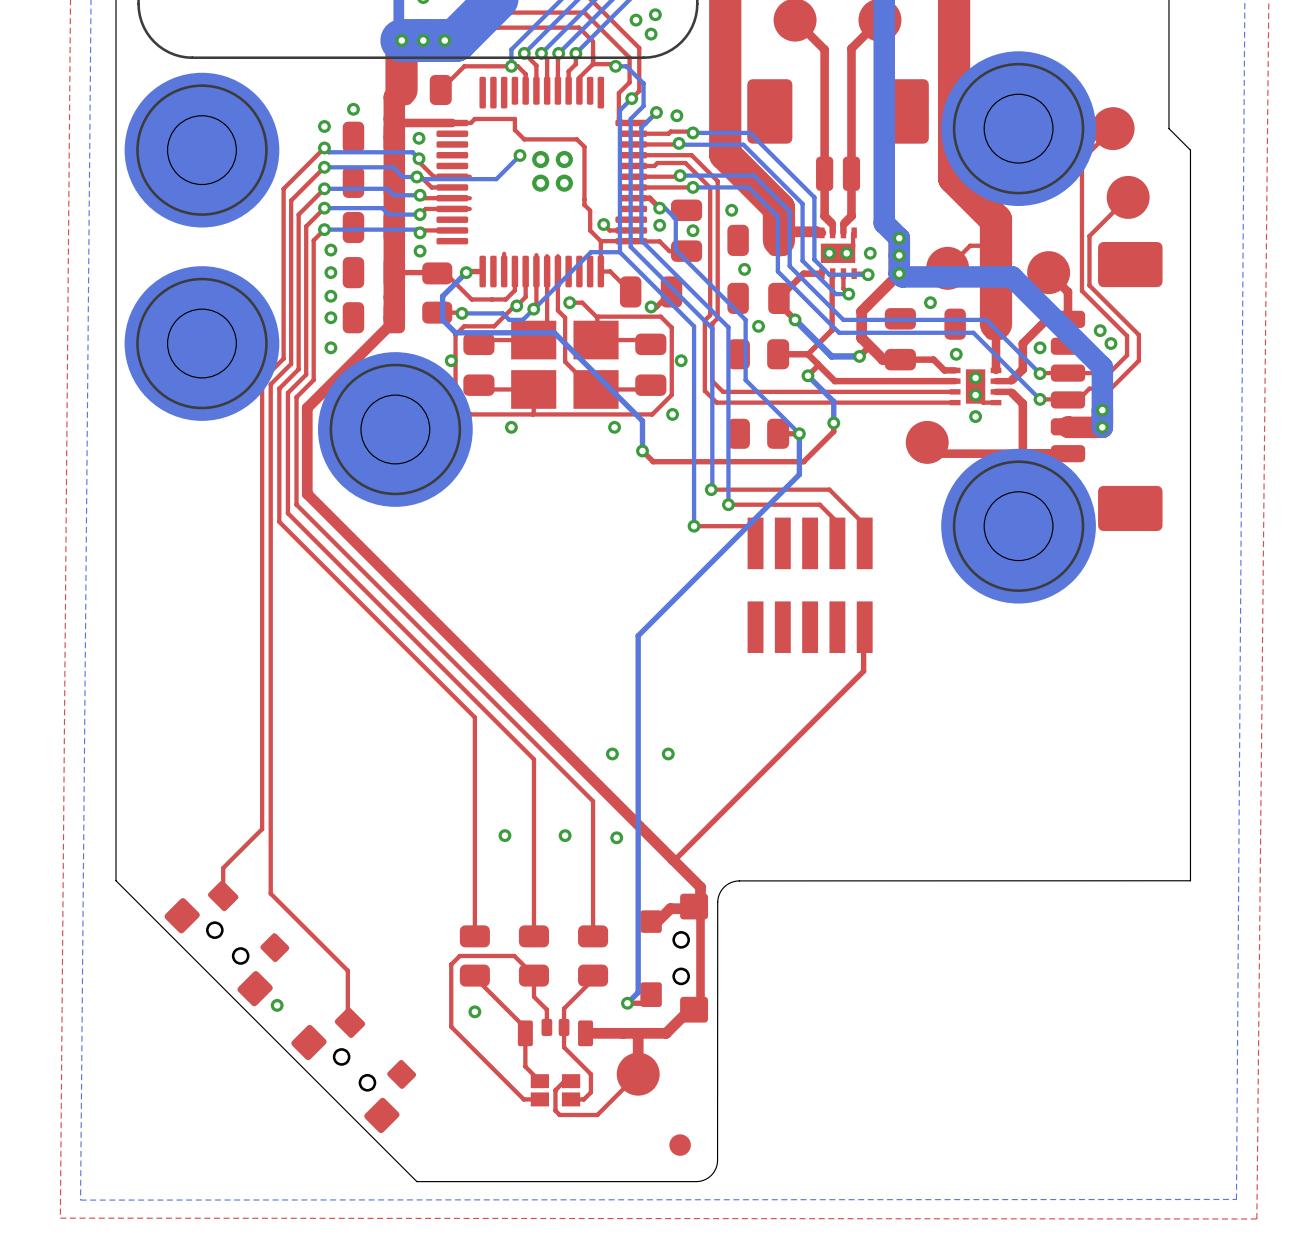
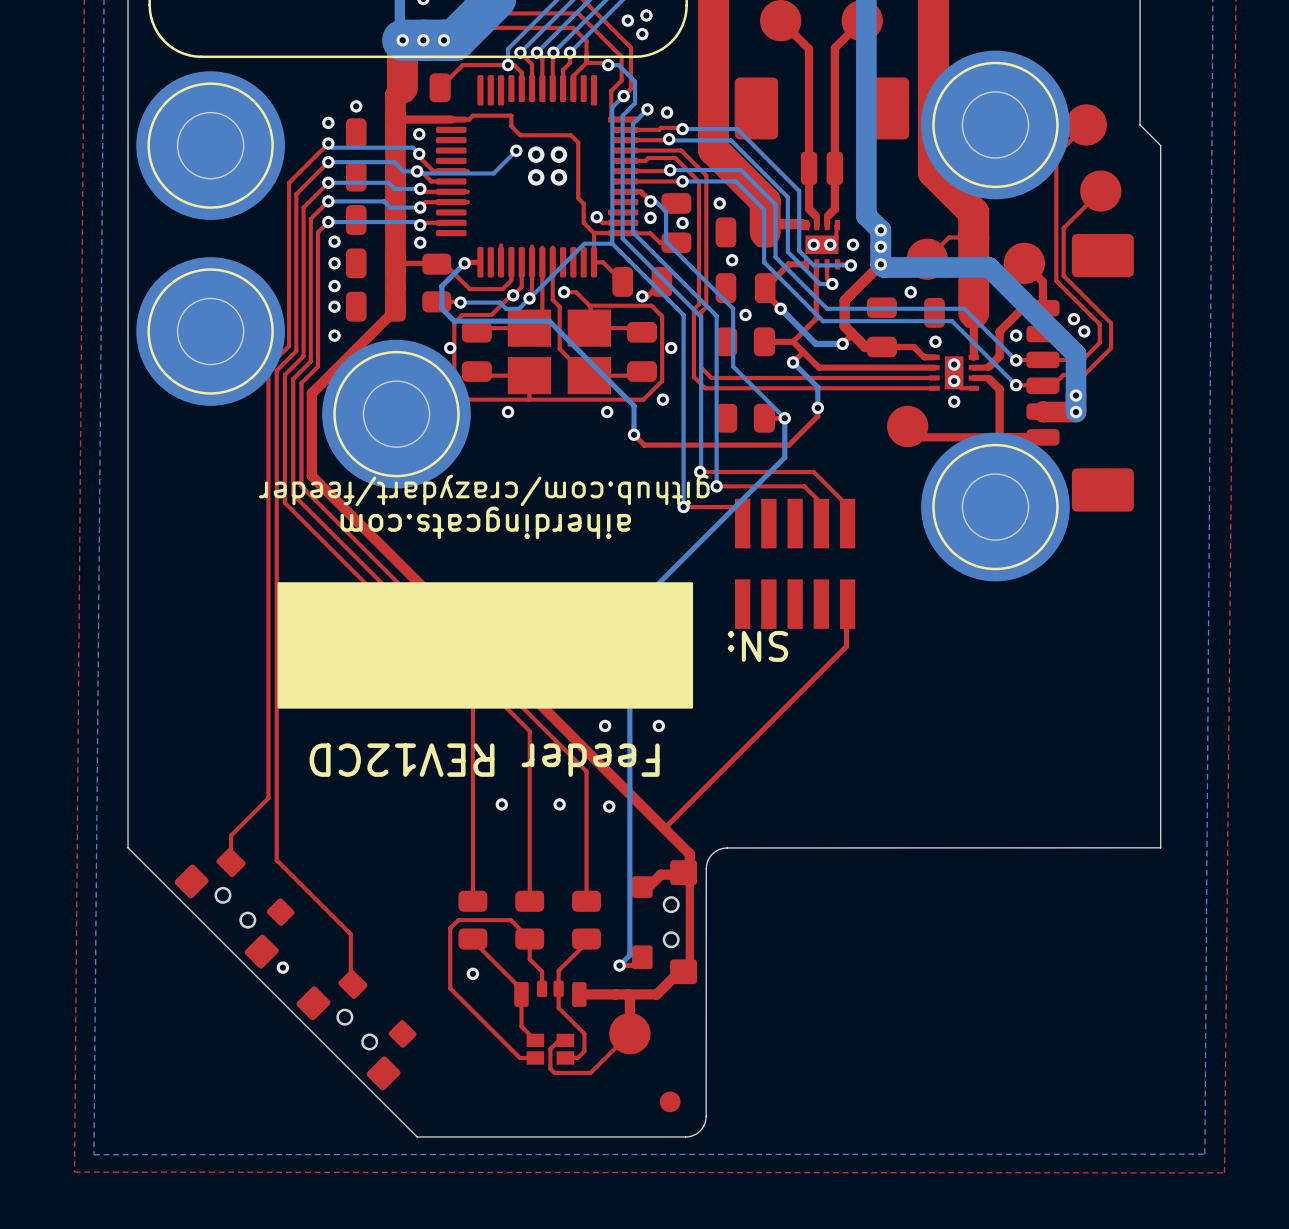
text: none -> github.com/crazydart/feeder (484, 490)
text: none -> aiherdingcats.com (485, 522)
drawing: none -> [277, 582, 694, 709]
text: none -> SN: (757, 646)
text: none -> Feeder REV12CD (484, 760)

